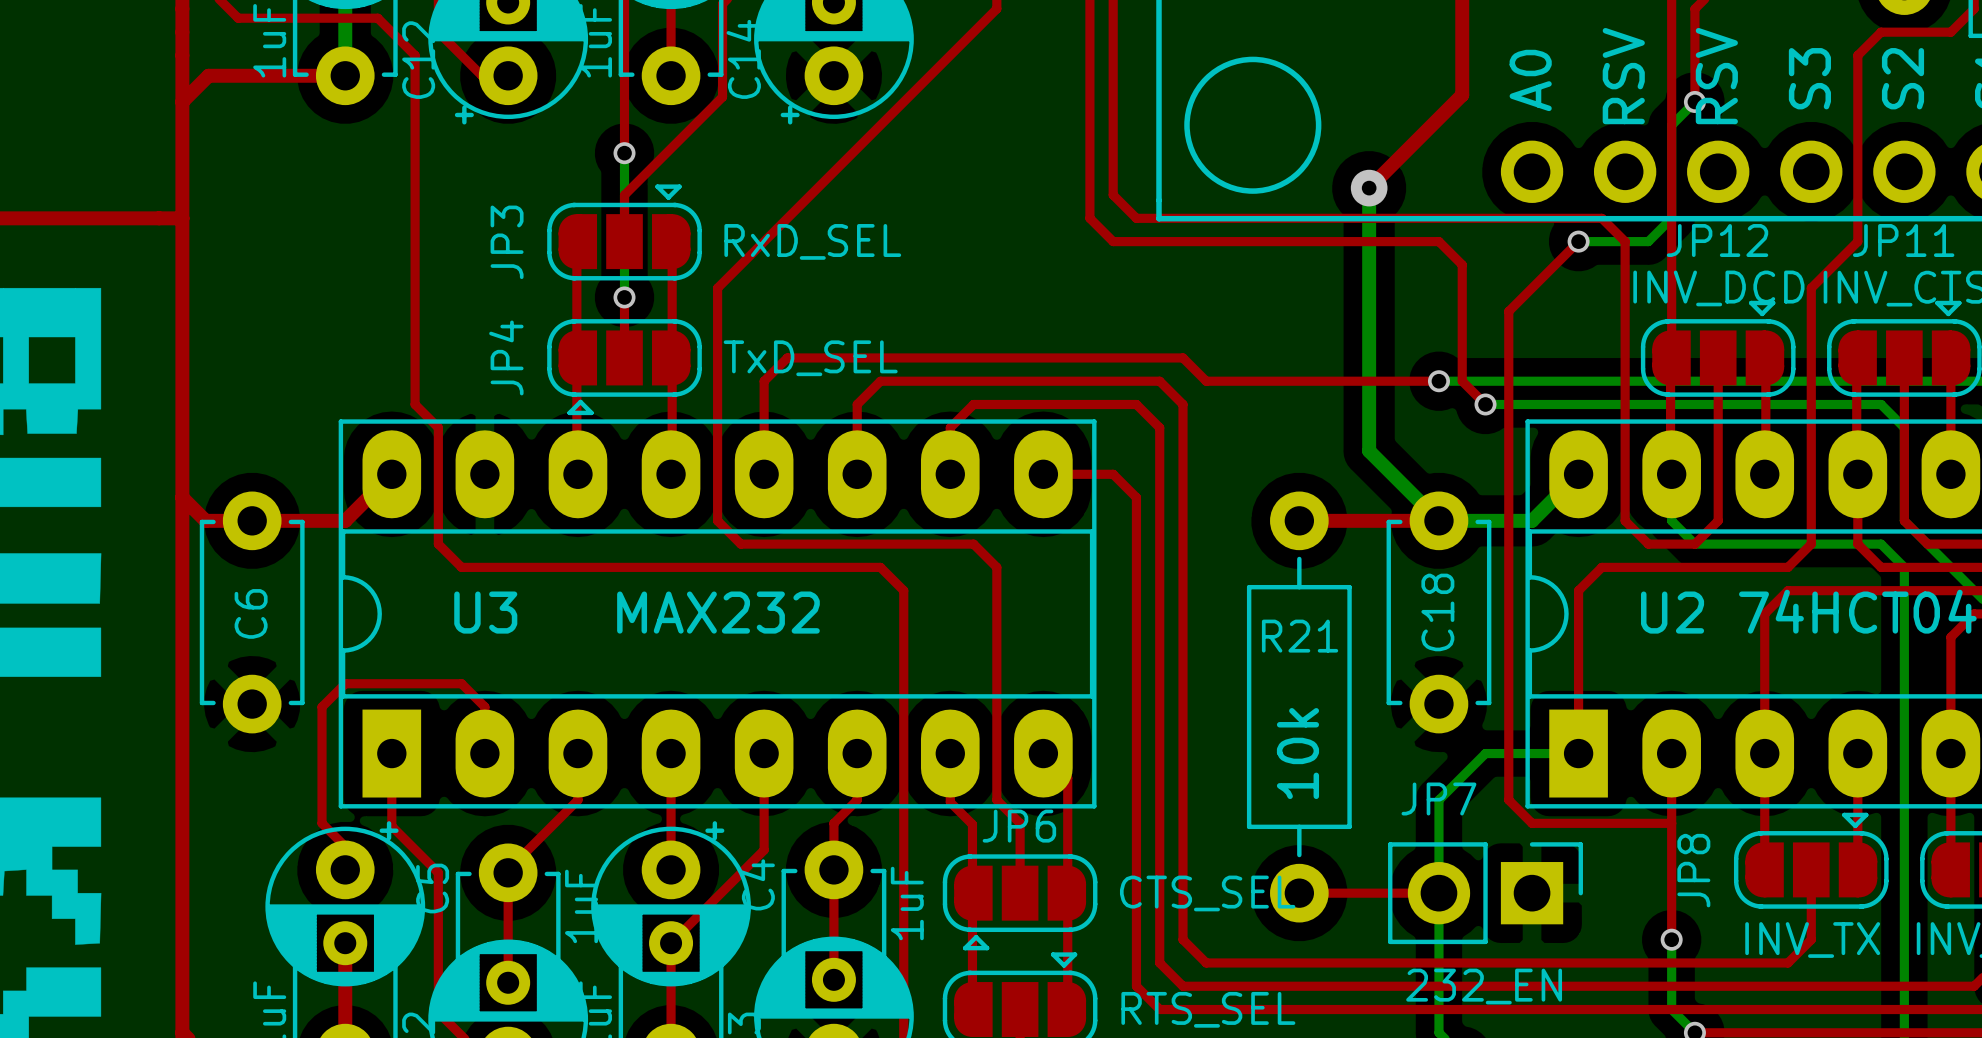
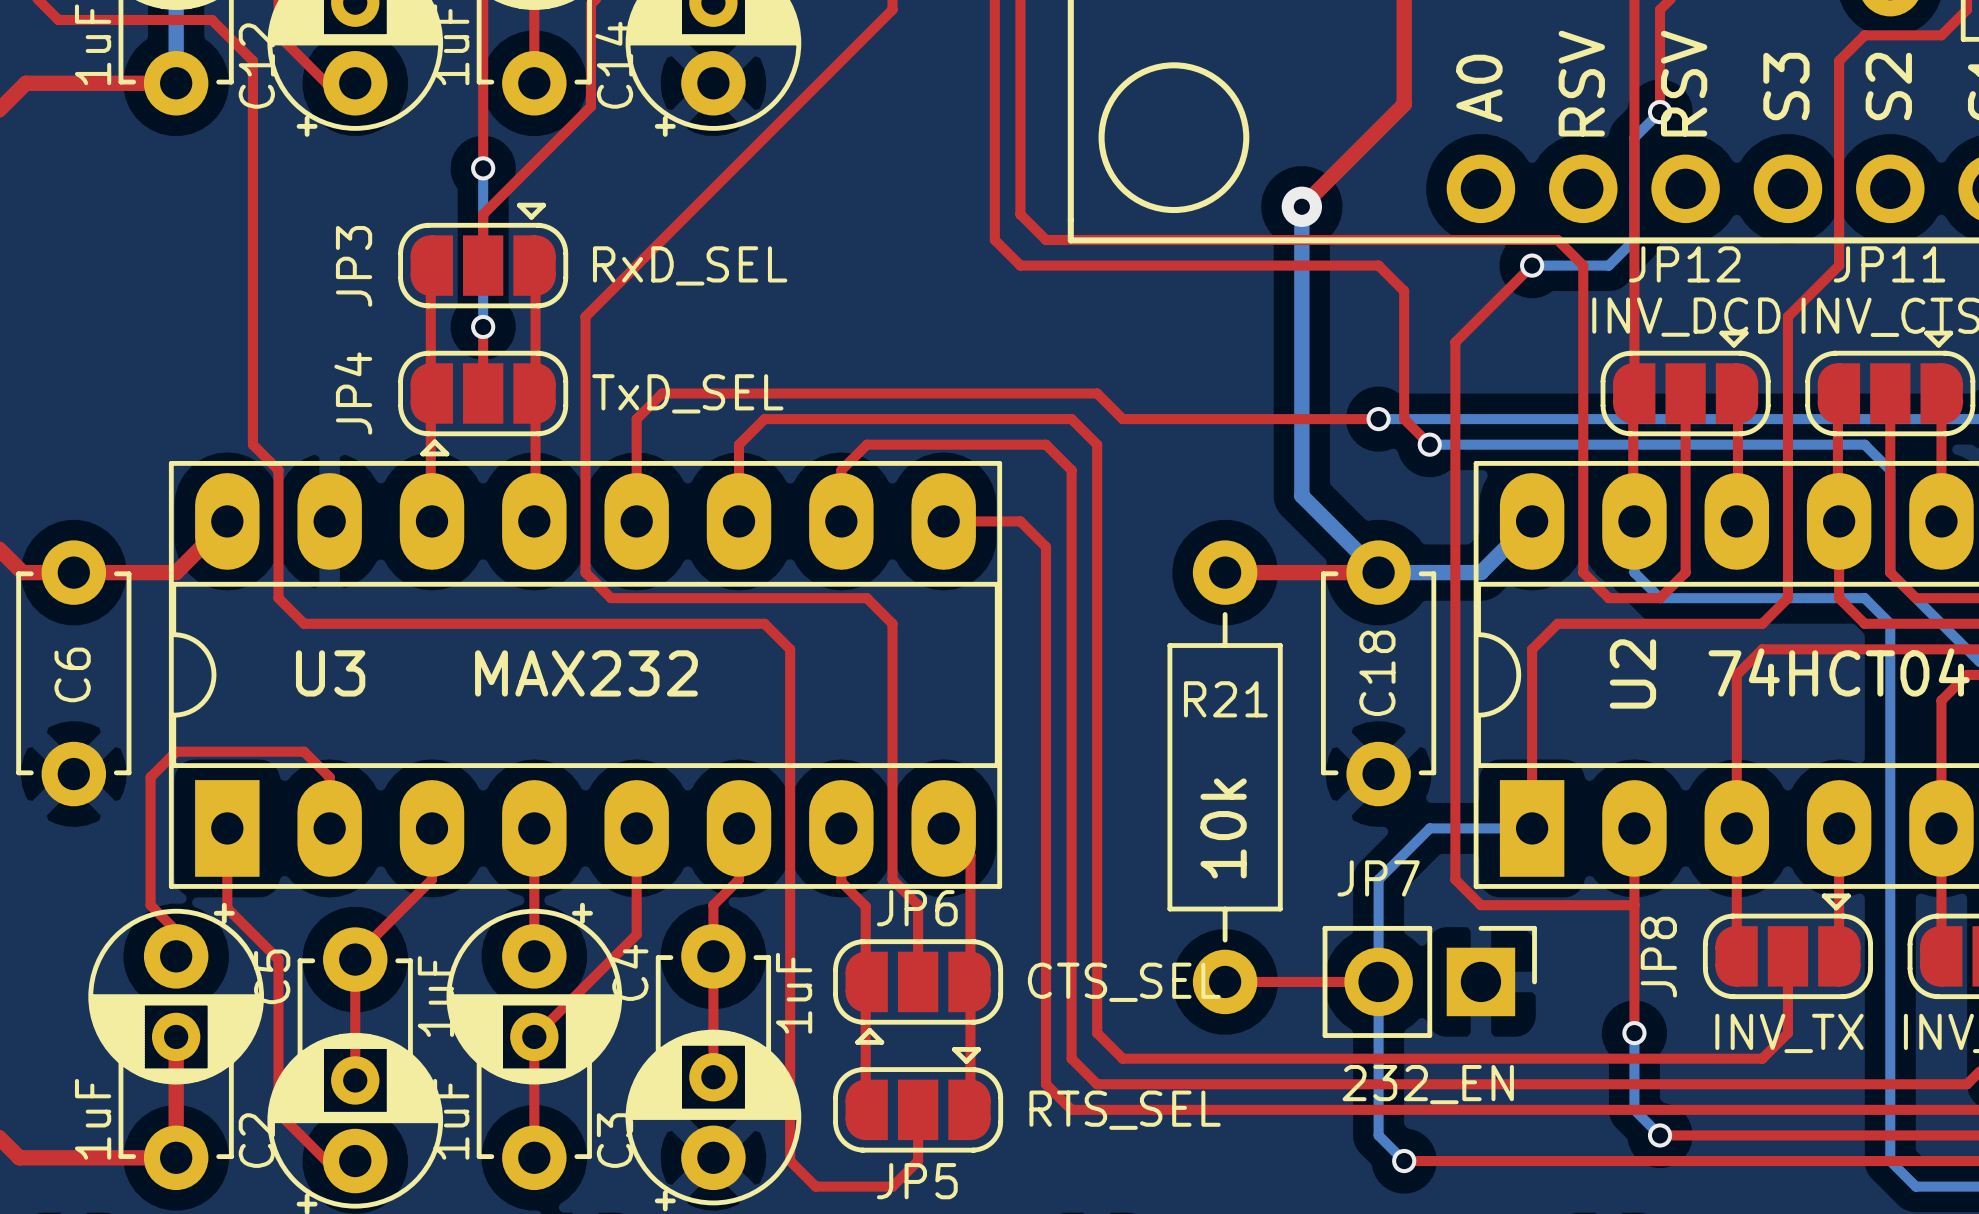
U2 name rotation: 0° (1672, 612) -> 90° counterclockwise (1632, 673)

